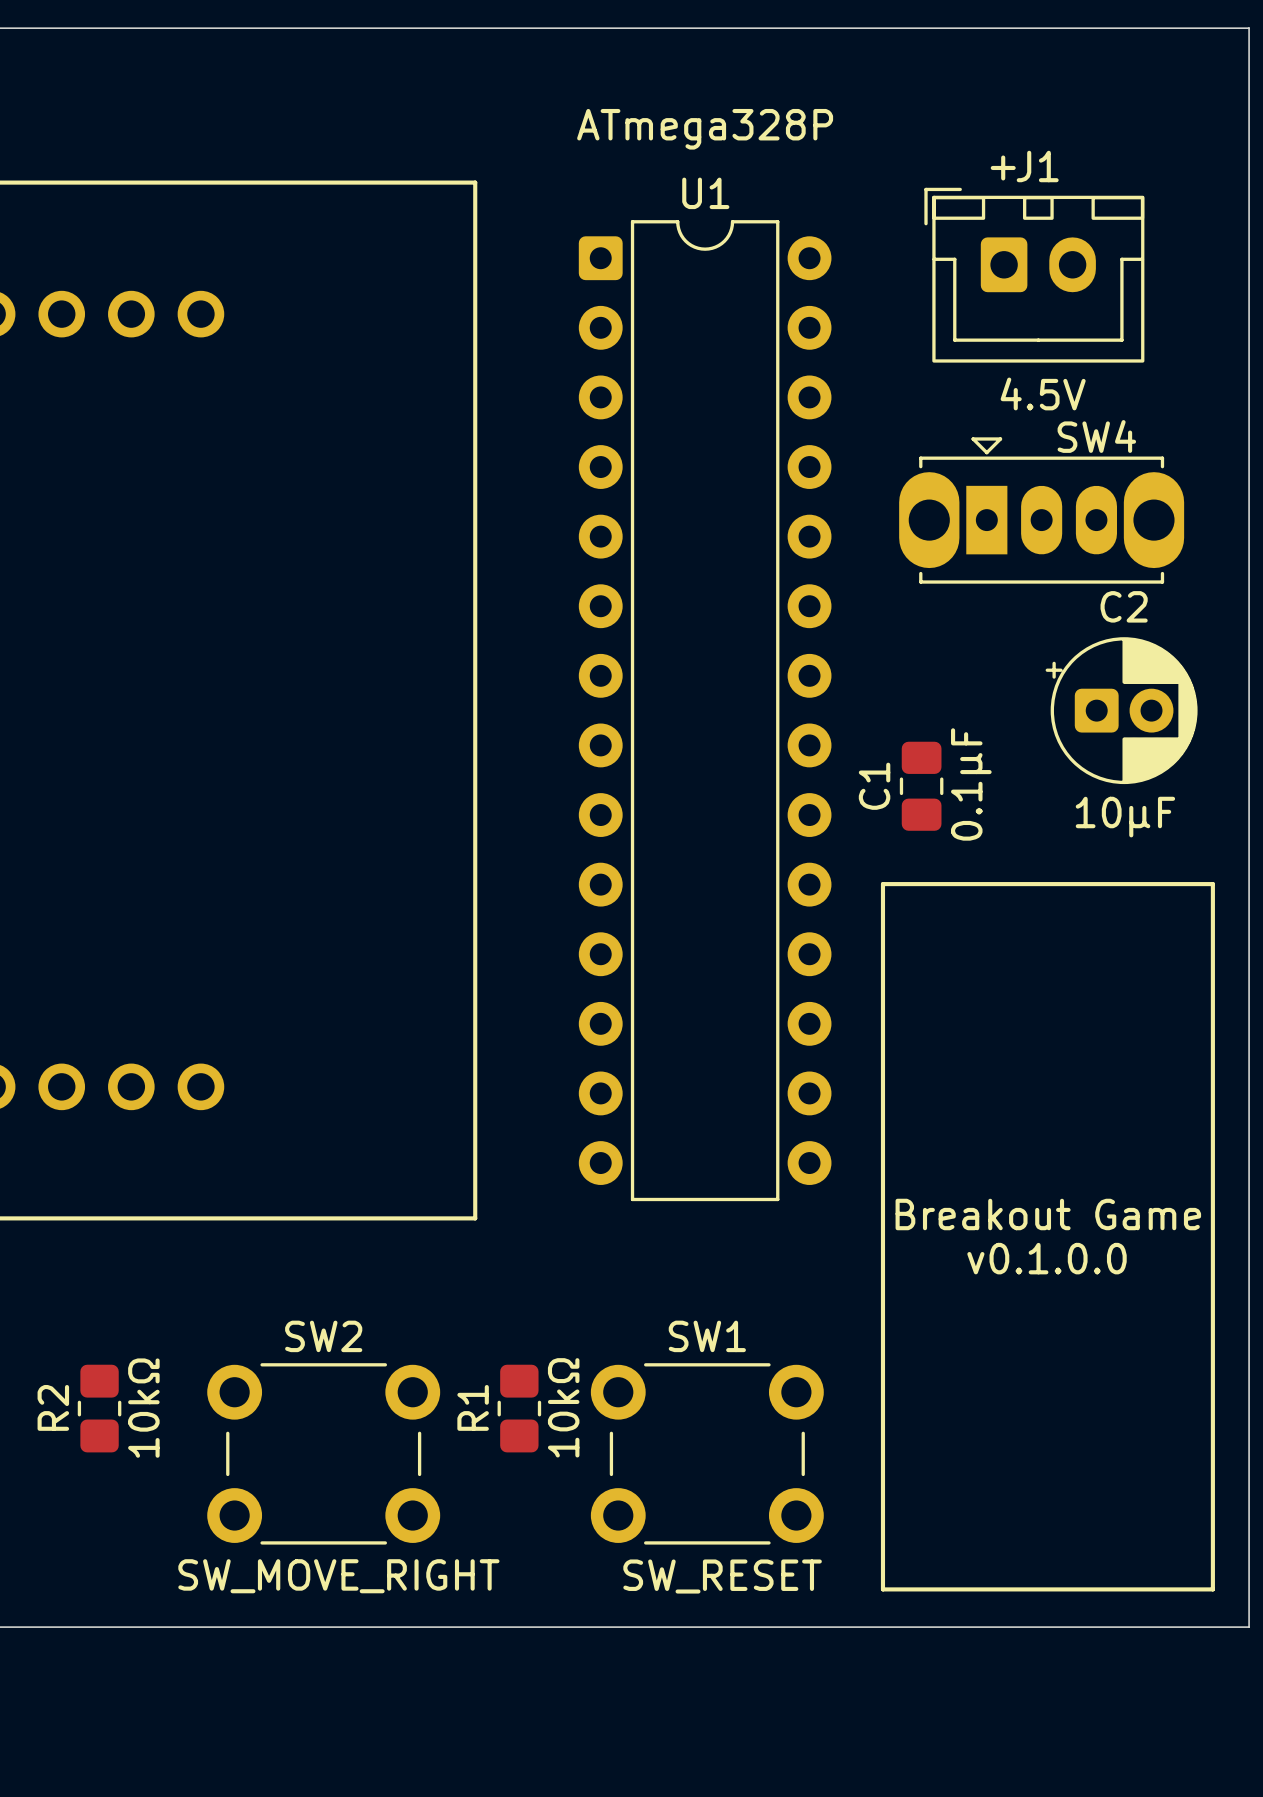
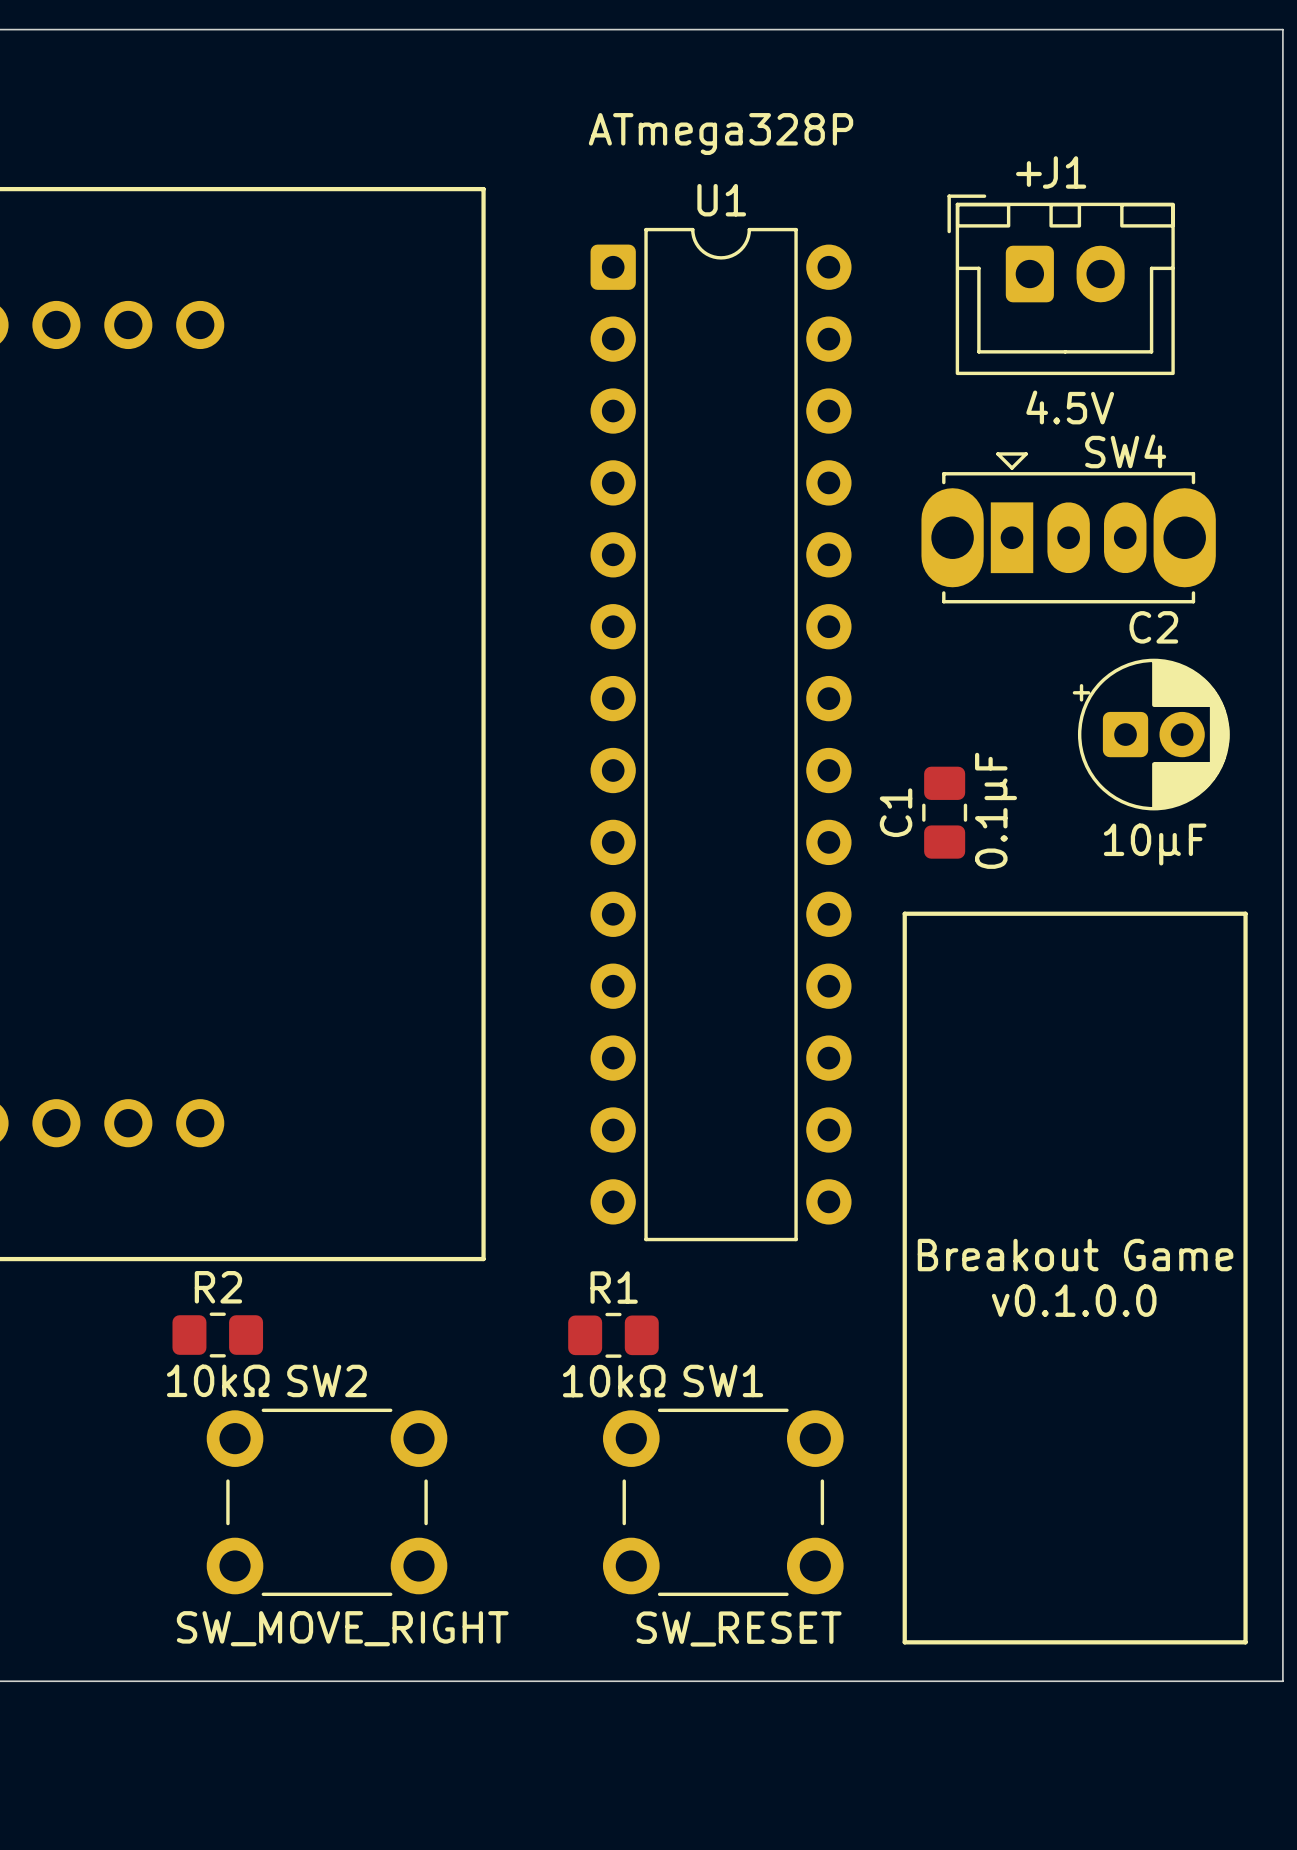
text rotation: 0° (563, 1407) -> 90° clockwise (614, 1381)
R2 rotation: 0° (99, 1408) -> 90° clockwise (217, 1335)
R2 position: (99, 1408) -> (217, 1335)
text rotation: 0° (143, 1408) -> 90° clockwise (218, 1380)
R1 rotation: 0° (519, 1408) -> 90° clockwise (613, 1335)
R1 position: (519, 1408) -> (613, 1335)

